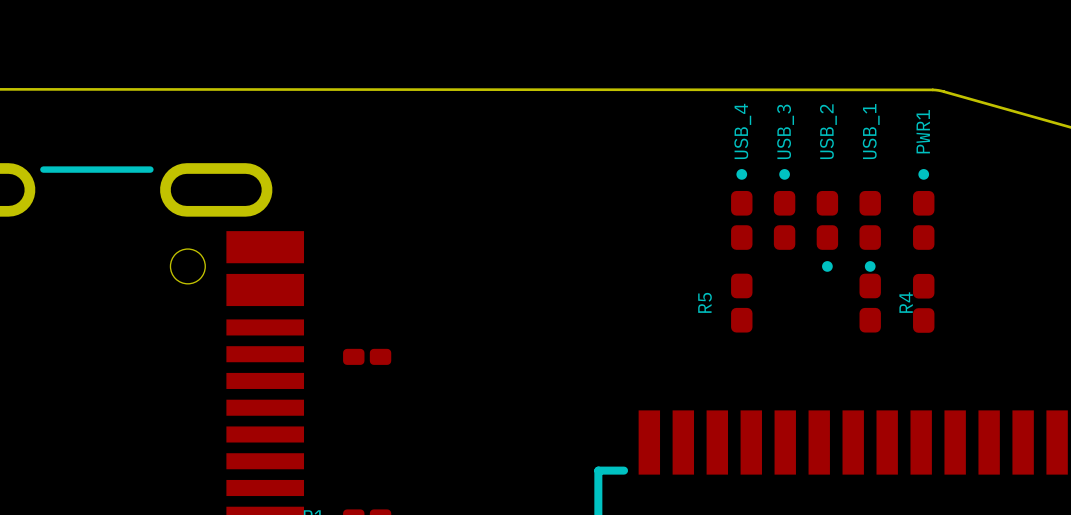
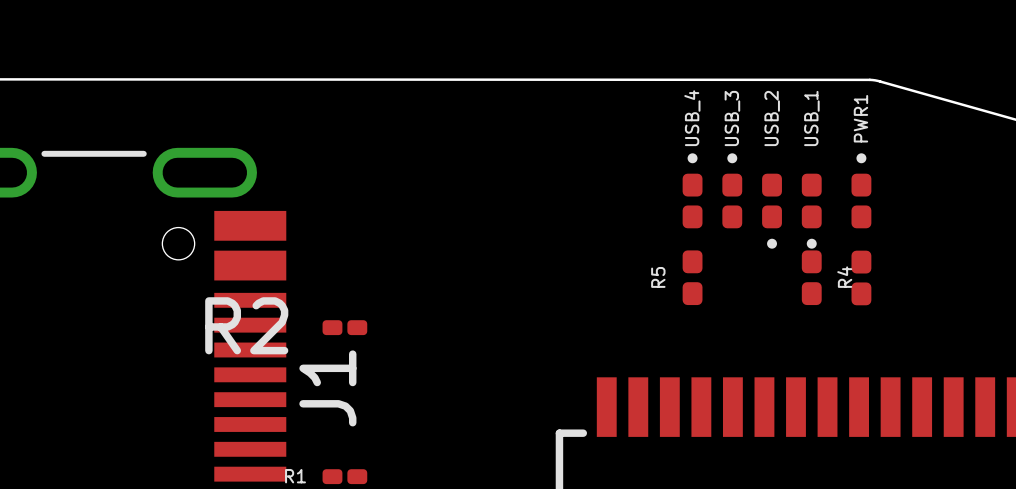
R2 name: none -> R2 (246, 325)
J1 name: none -> J1 (327, 388)

